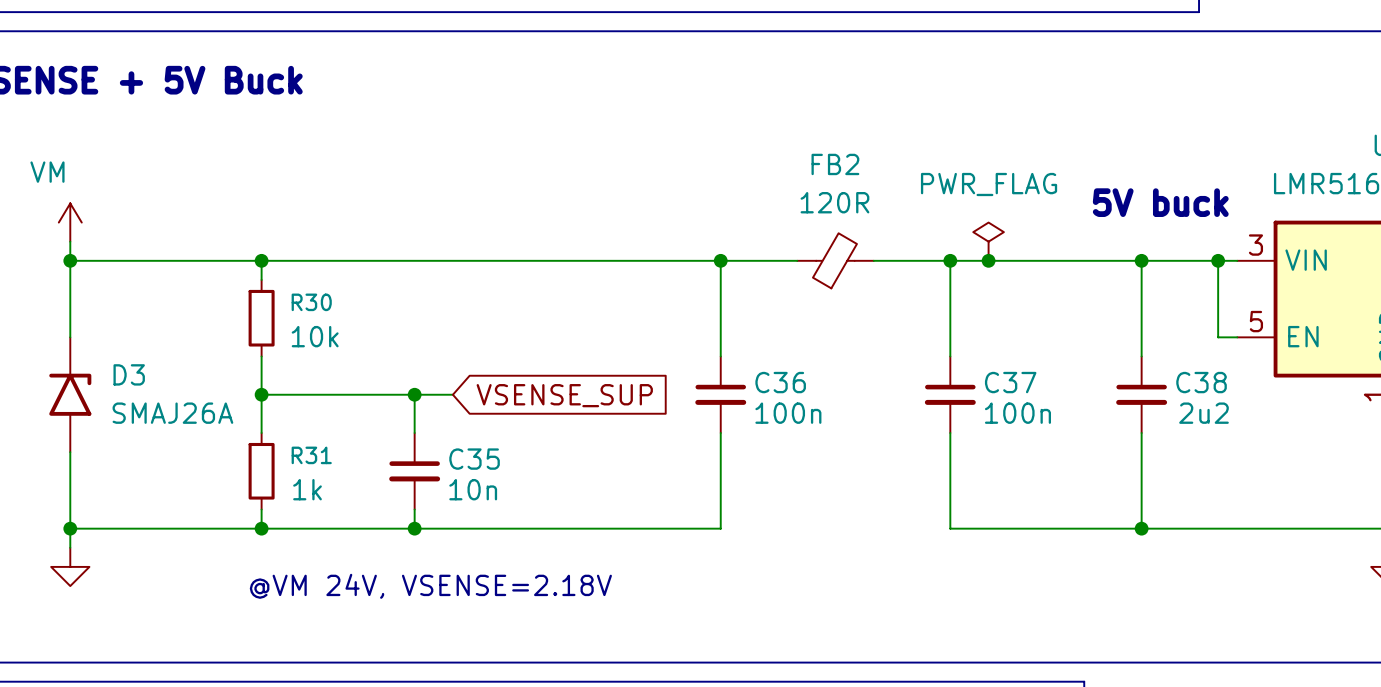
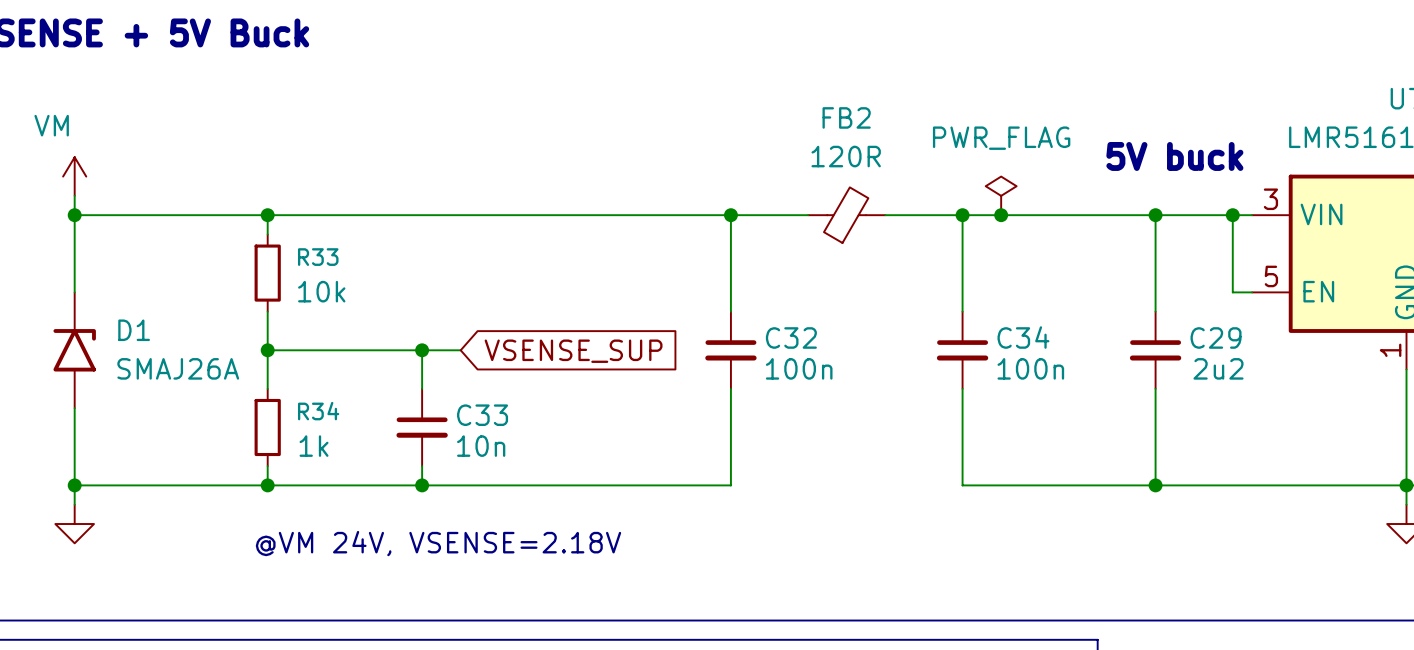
R30 name: R30 (311, 302) -> R33 (318, 257)
D3 name: D3 (129, 374) -> D1 (134, 330)
C36 name: C36 (780, 382) -> C32 (791, 337)
C37 name: C37 (1010, 382) -> C34 (1023, 337)
C38 name: C38 (1201, 382) -> C29 (1216, 337)
R31 name: R31 (311, 455) -> R34 (318, 411)
C35 name: C35 (474, 459) -> C33 (482, 415)

